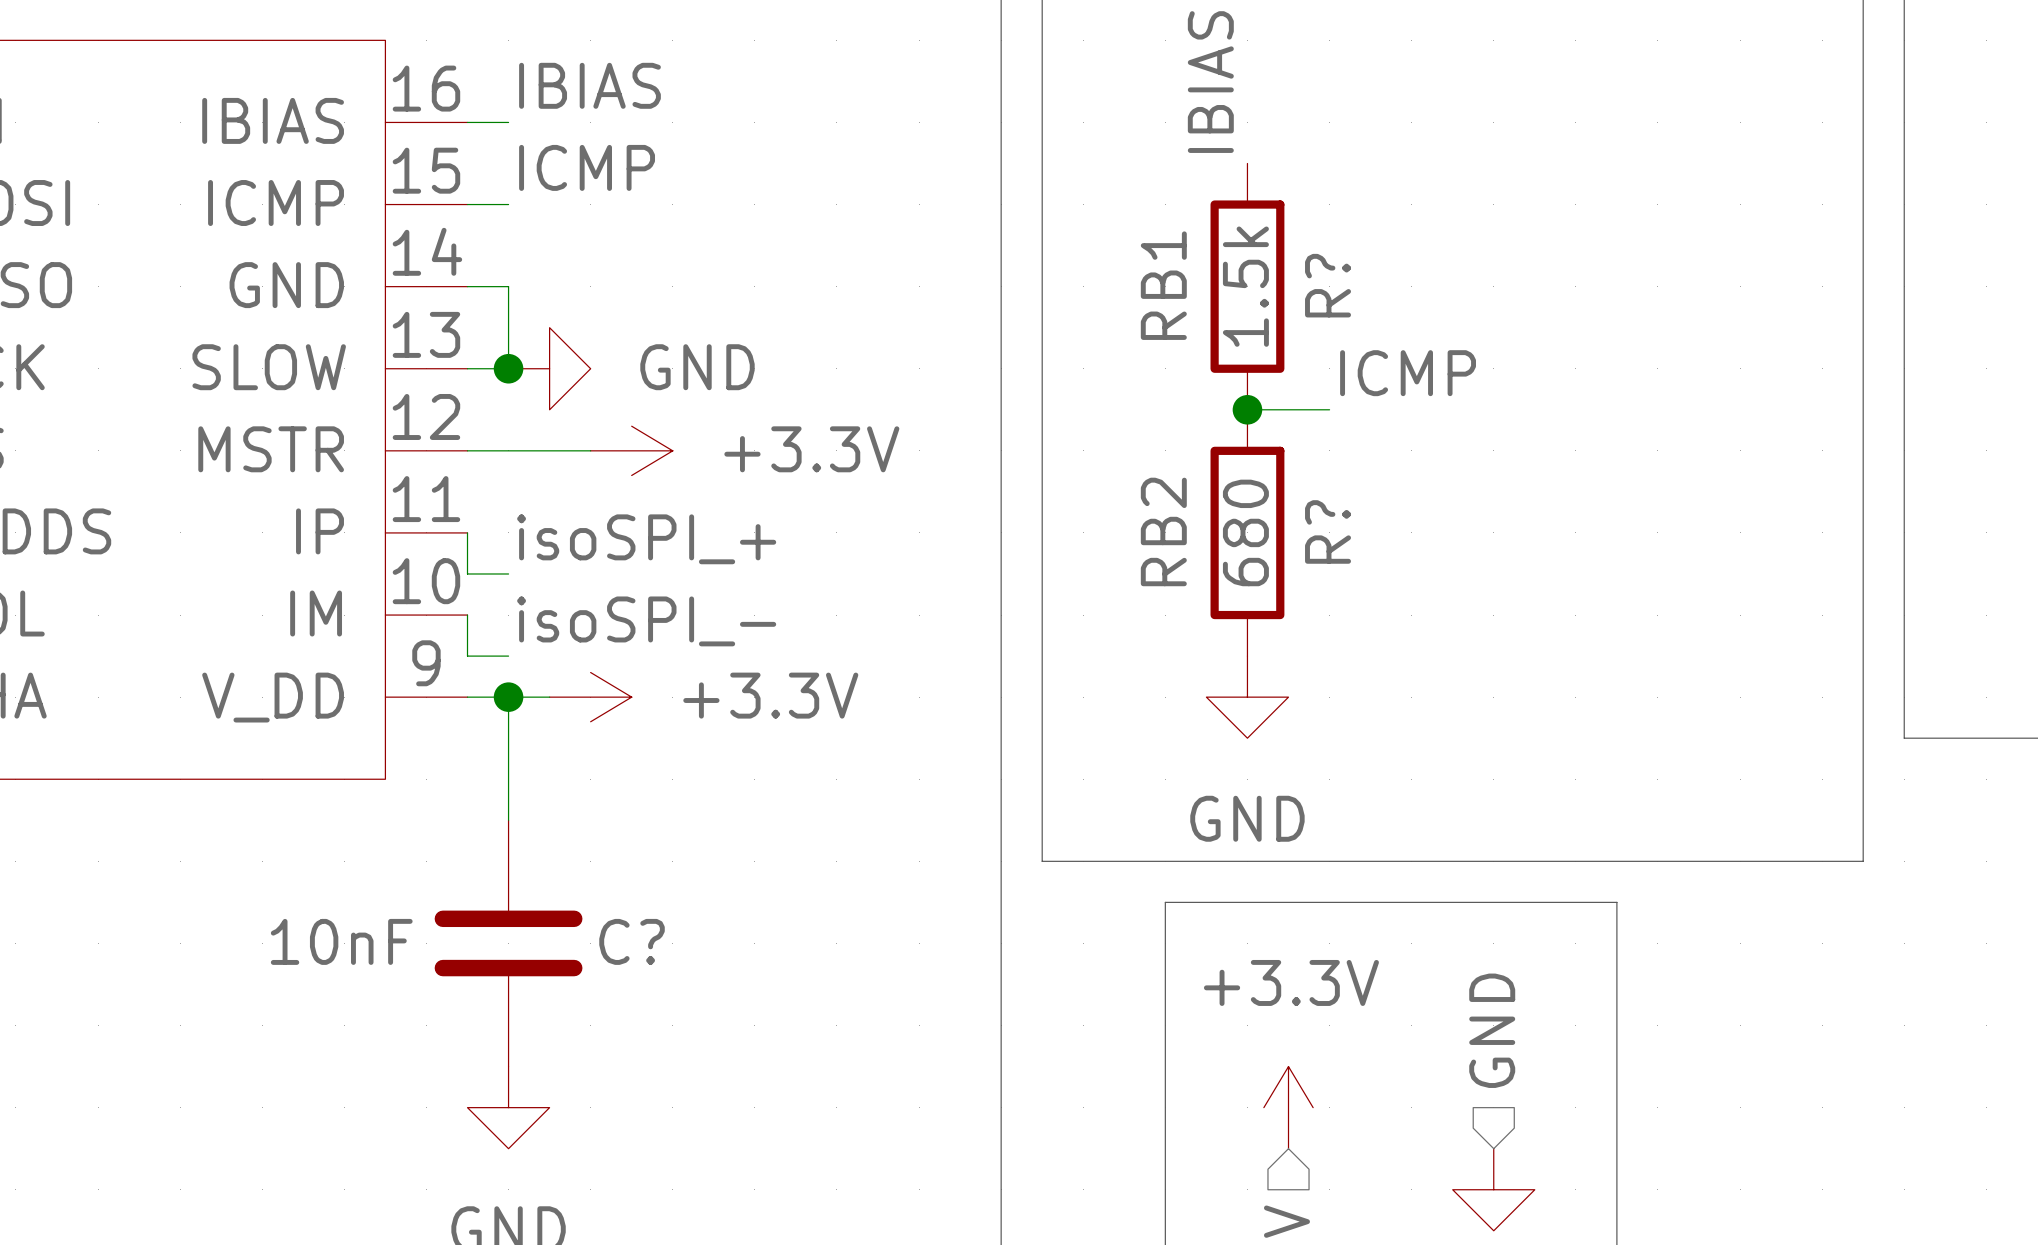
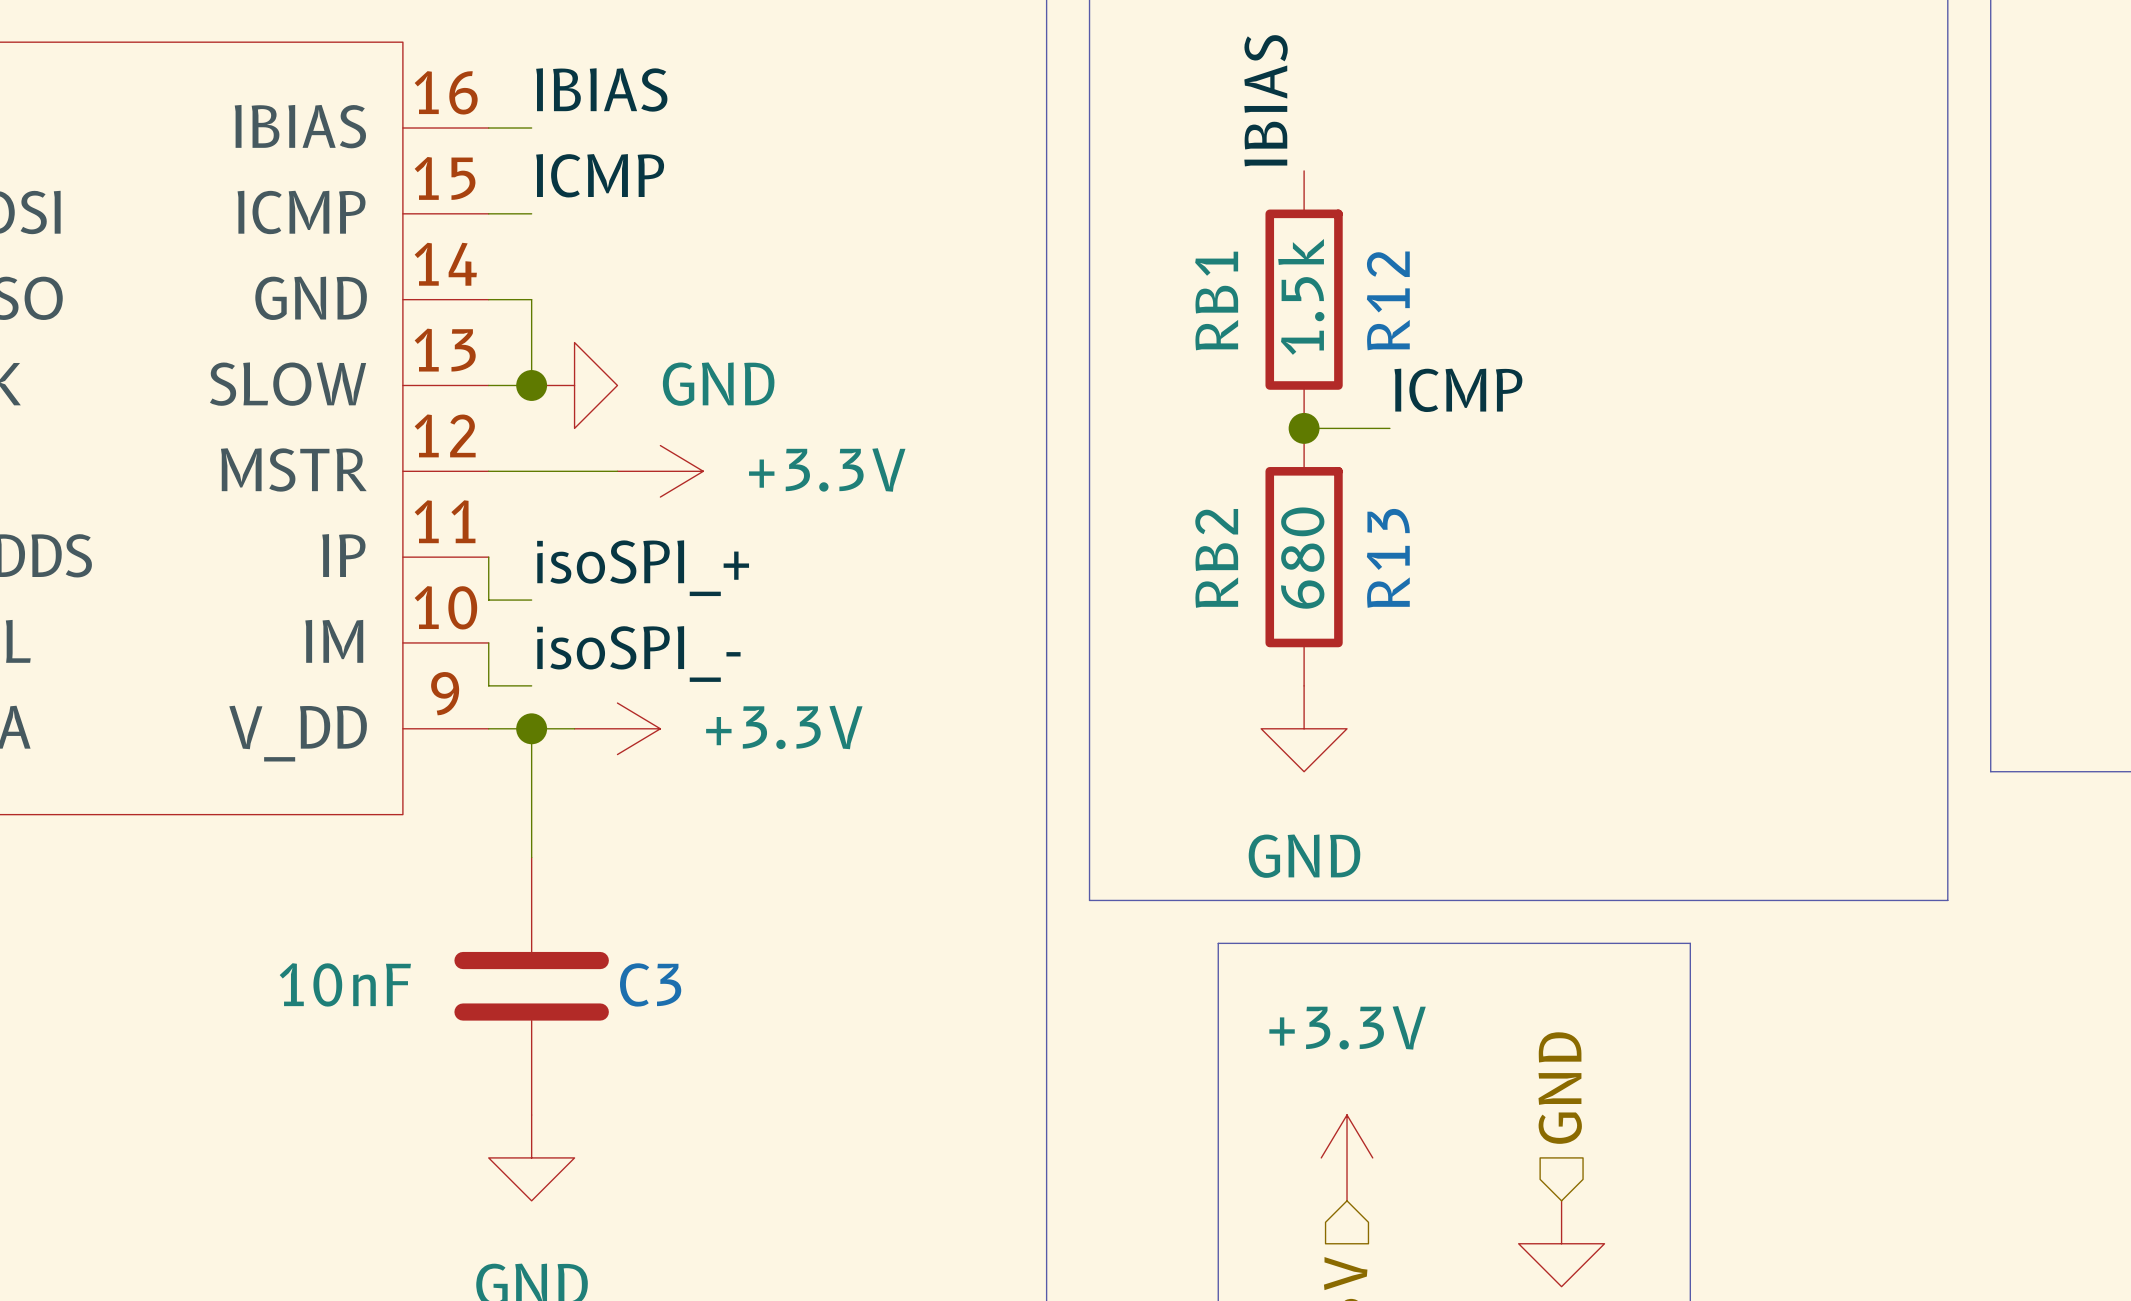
R? name: R? (1328, 285) -> R12 (1388, 300)
R? name: R? (1328, 531) -> R13 (1388, 558)
C? name: C? (632, 941) -> C3 (650, 984)

